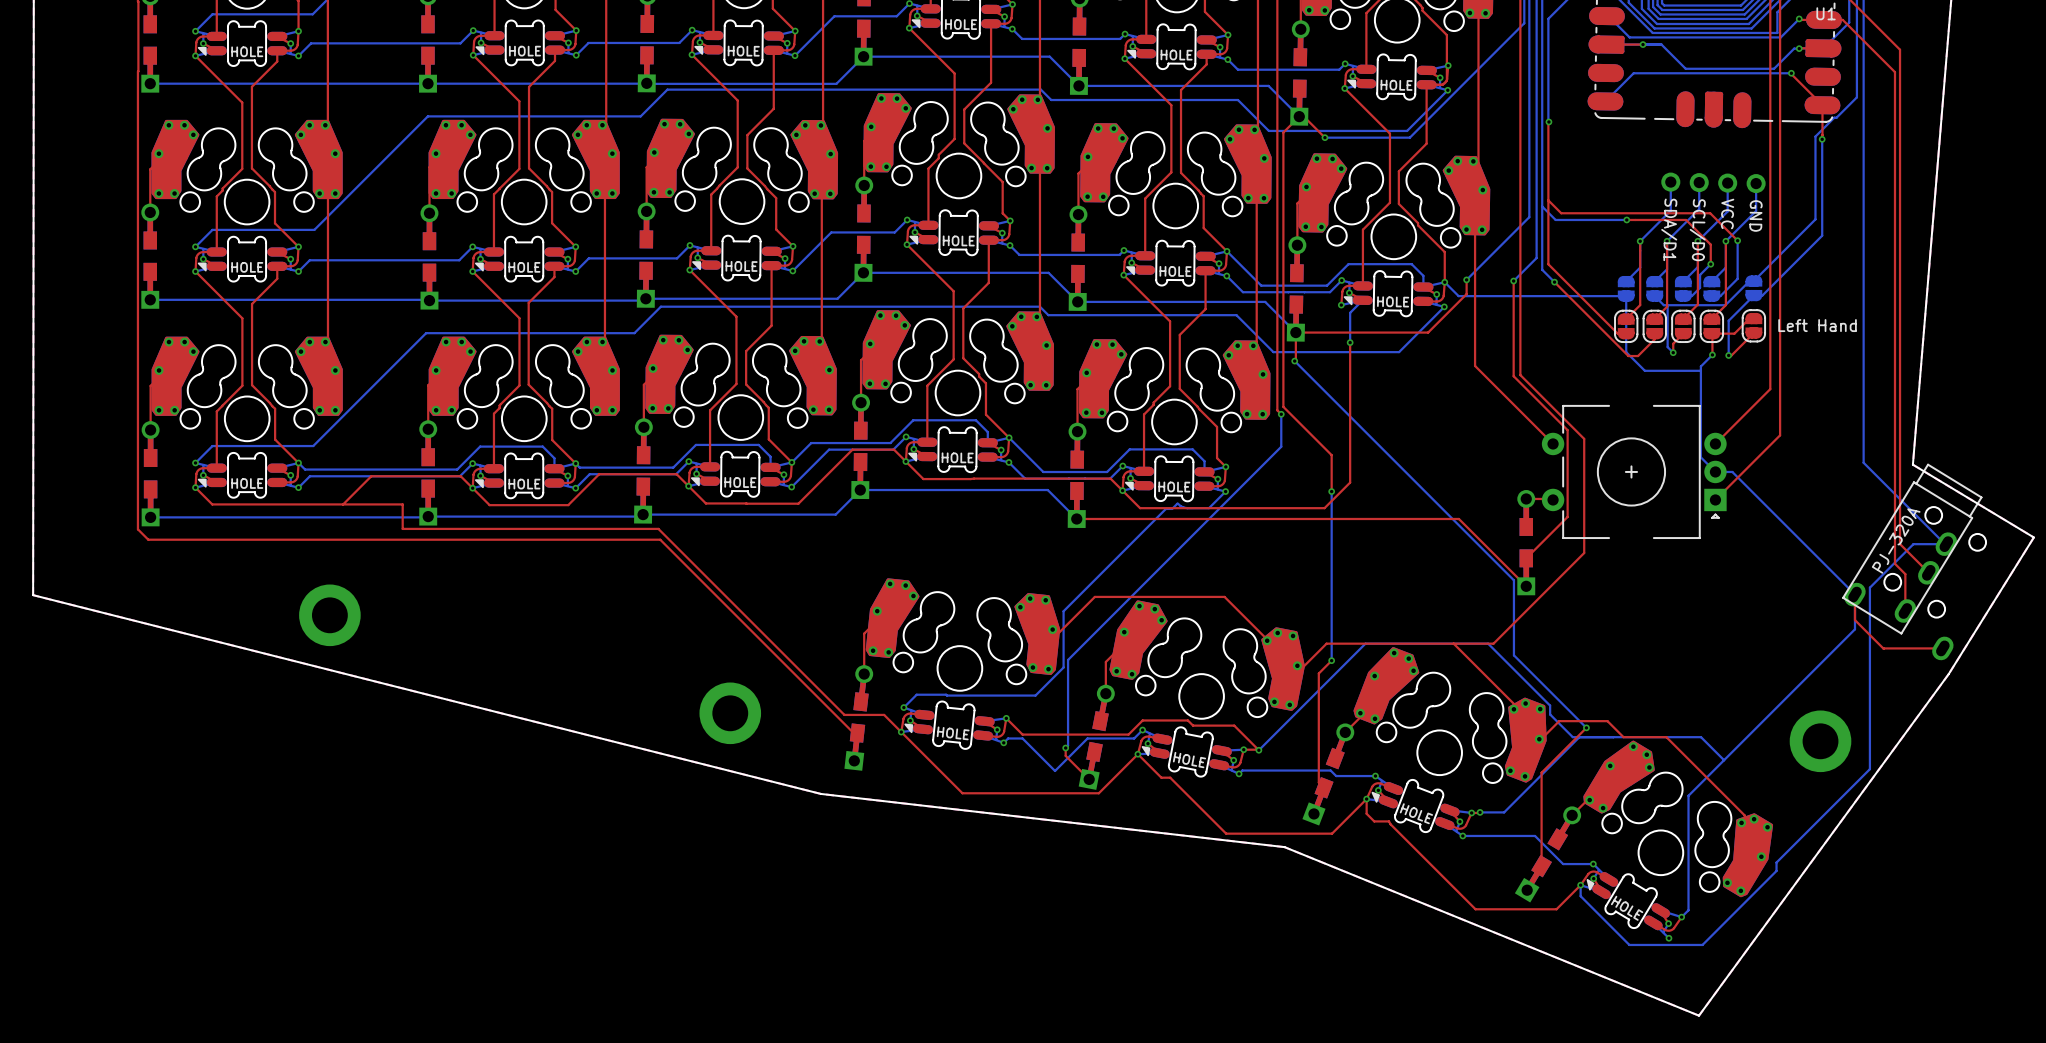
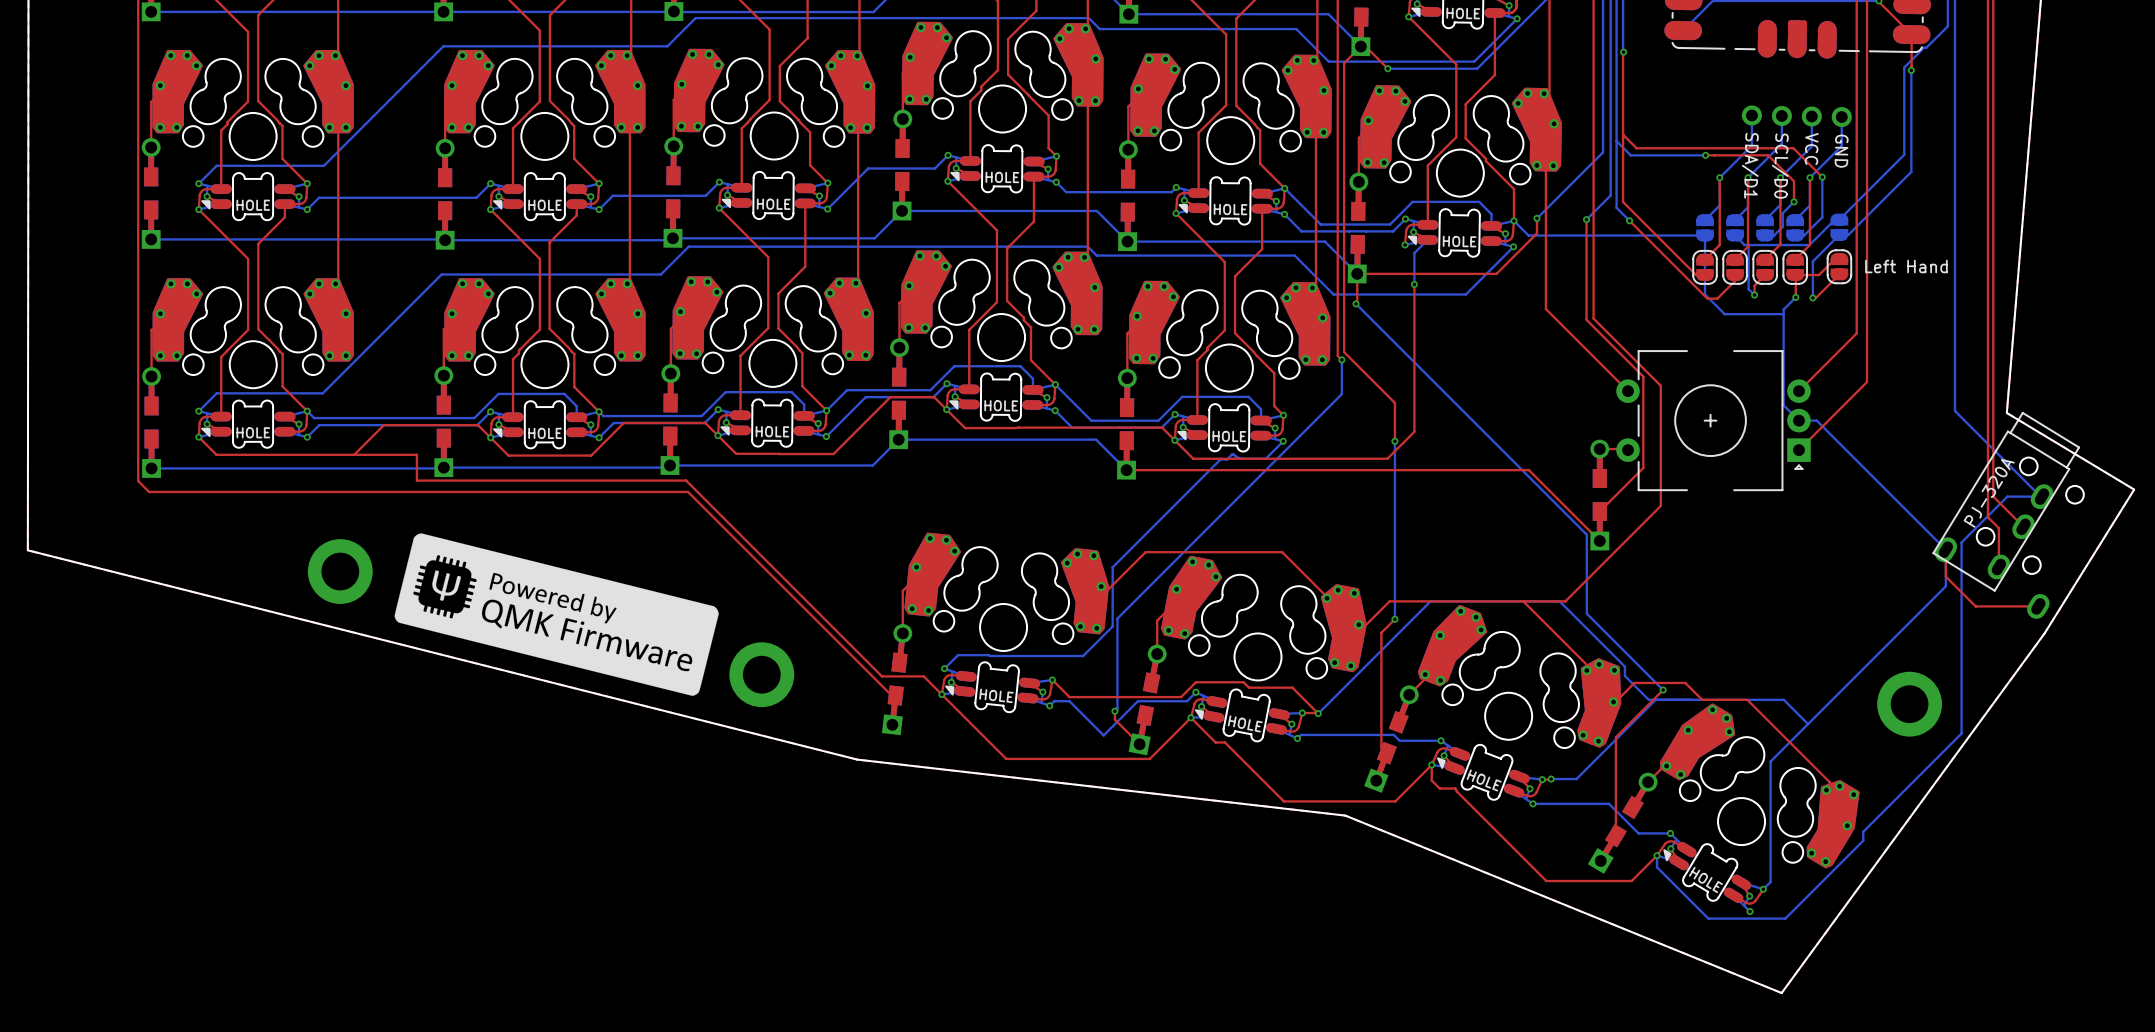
drawing: none -> [394, 533, 719, 696]

